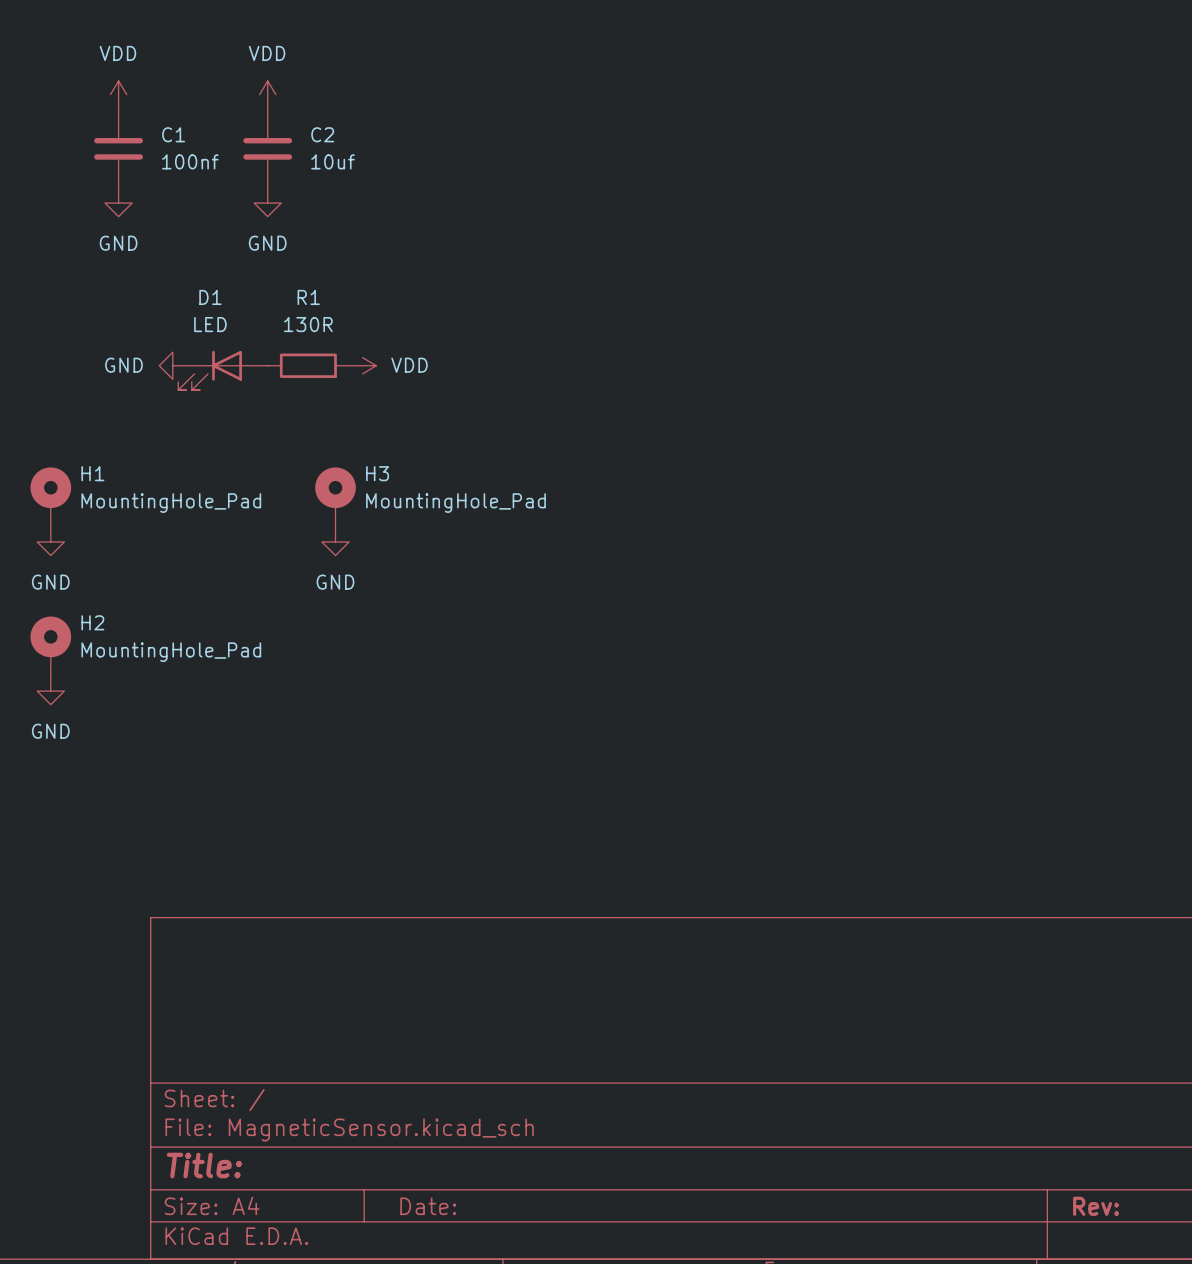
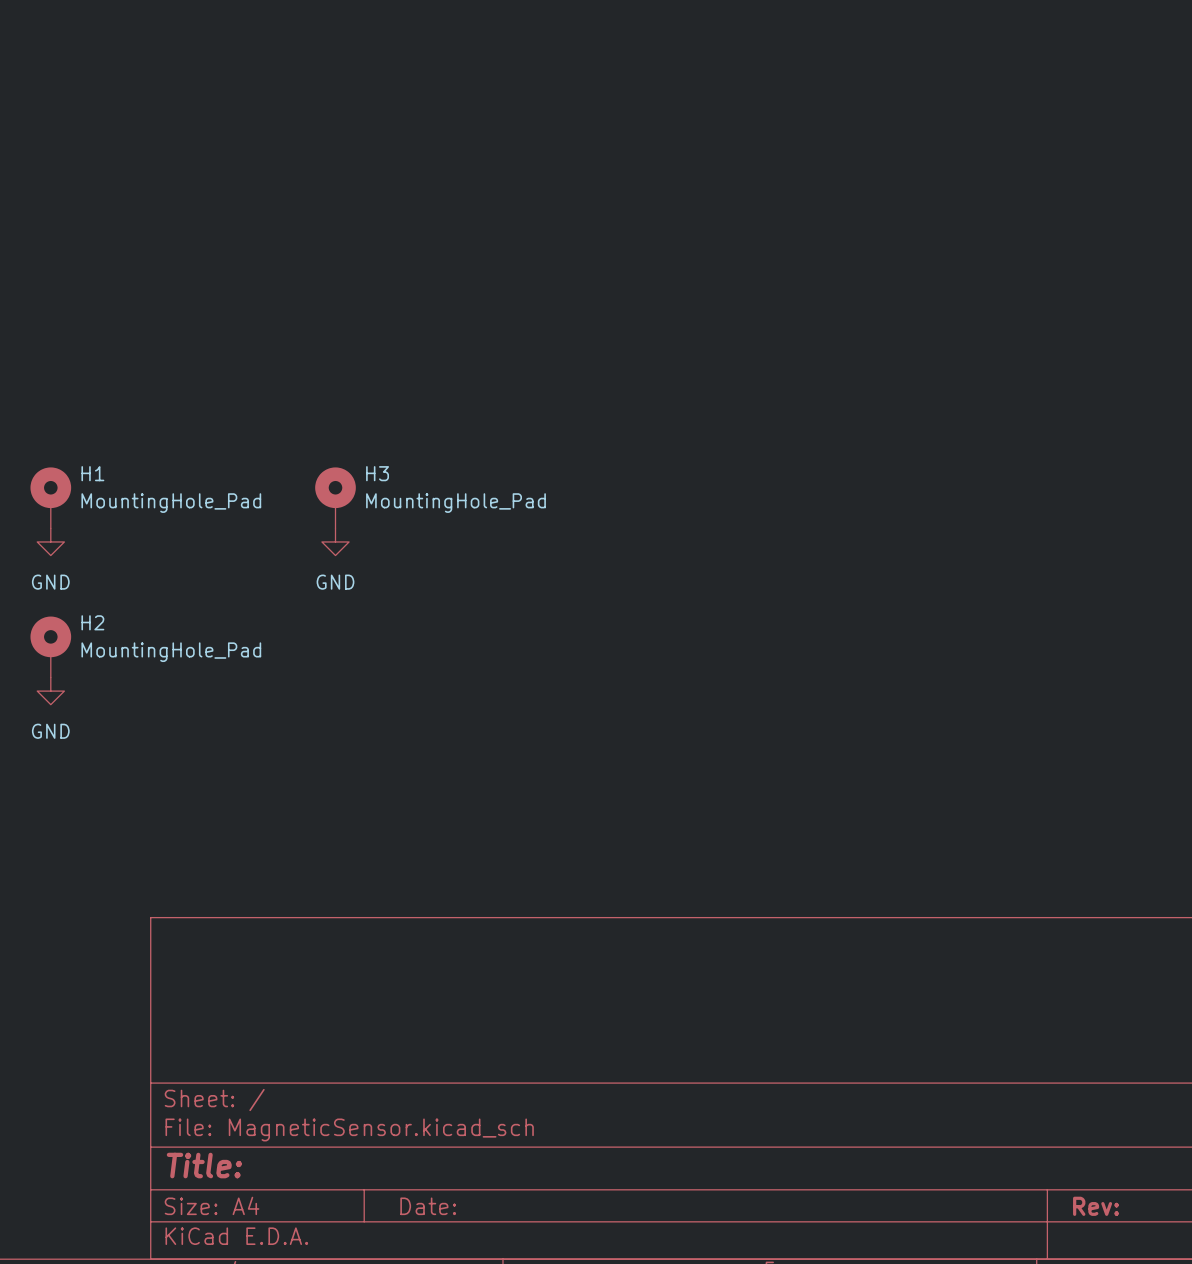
power symbol: VDD (118, 94) -> none
power symbol: VDD (267, 94) -> none
C1: 100nf (118, 148) -> none
C2: 10uf (267, 148) -> none
power symbol: GND (118, 203) -> none
power symbol: GND (267, 203) -> none
power symbol: GND (172, 365) -> none
R1: 130R (308, 365) -> none
power symbol: VDD (362, 365) -> none
D1: LED (222, 370) -> none

